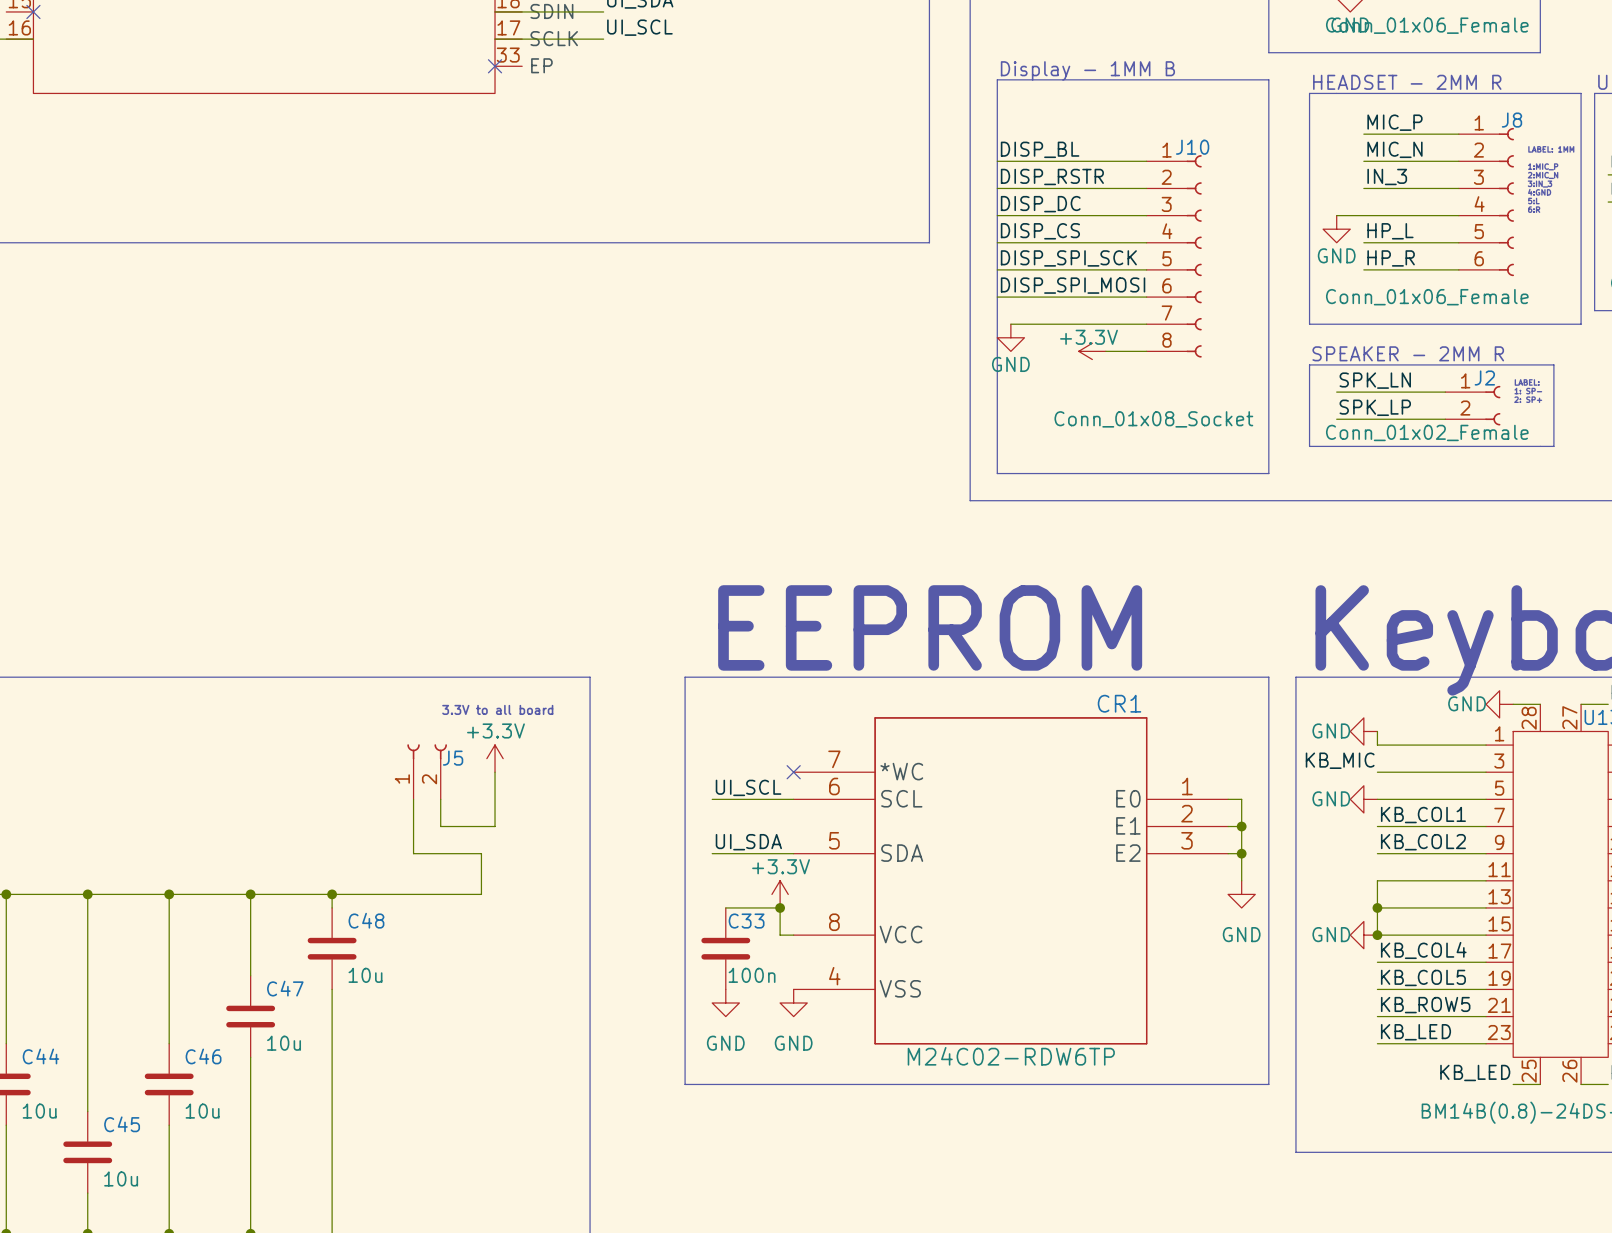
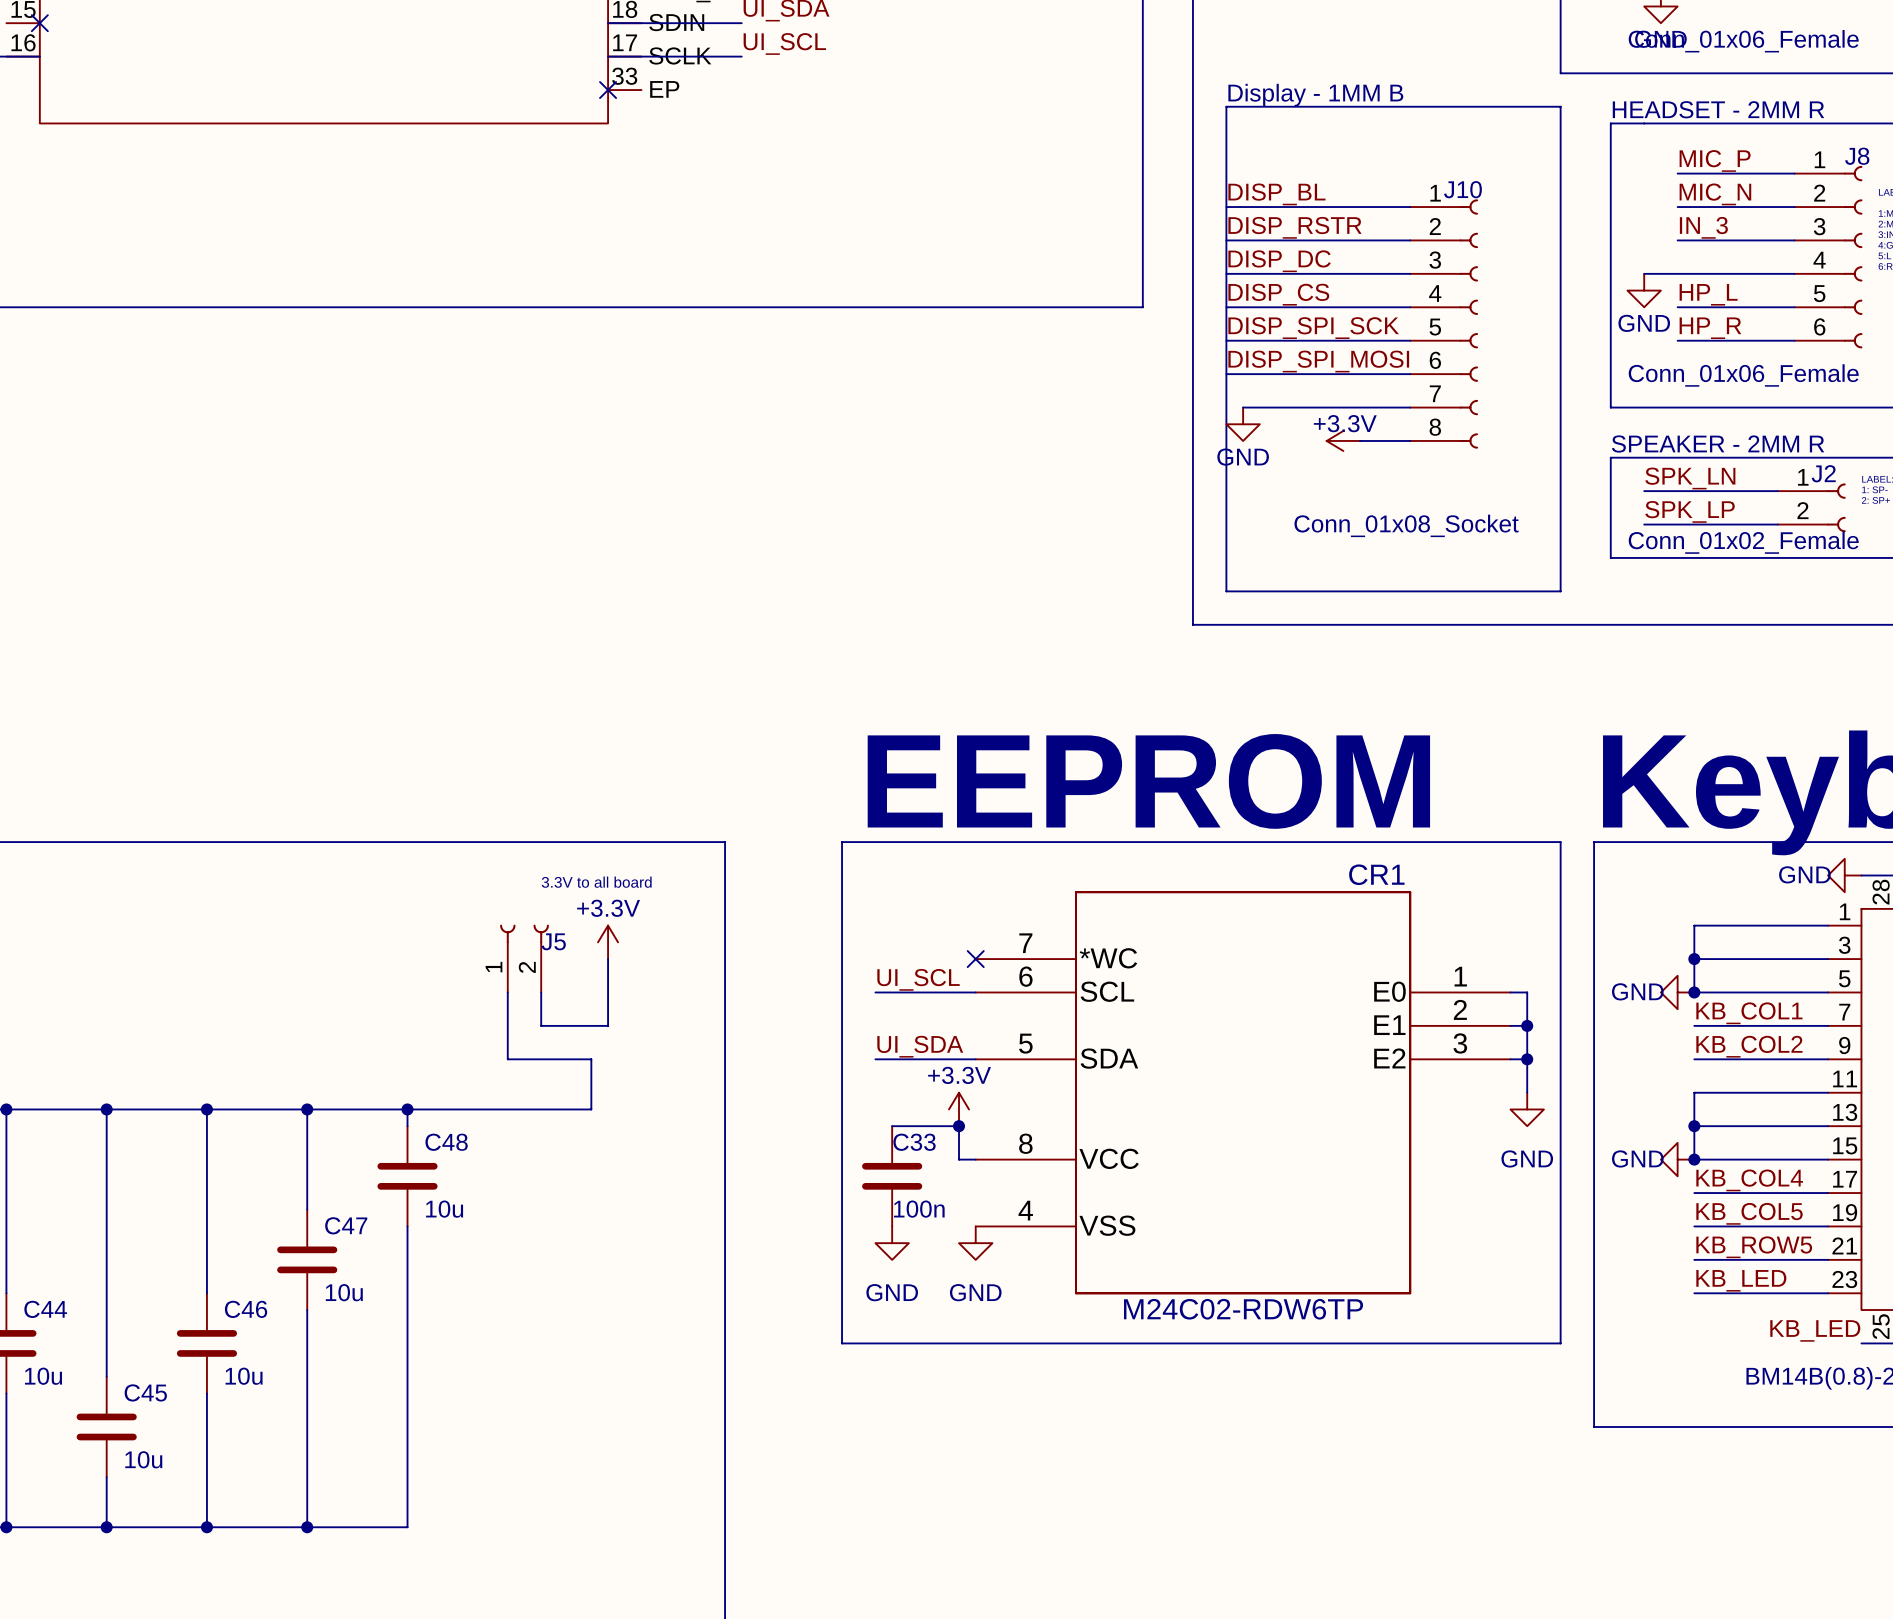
power symbol: GND (1363, 731) -> none
wire: (1377, 731) (1377, 745) -> (1694, 992) (1694, 925)
label: KB_MIC (1340, 760) -> none
junction: none -> (1694, 959)
junction: none -> (1694, 992)

